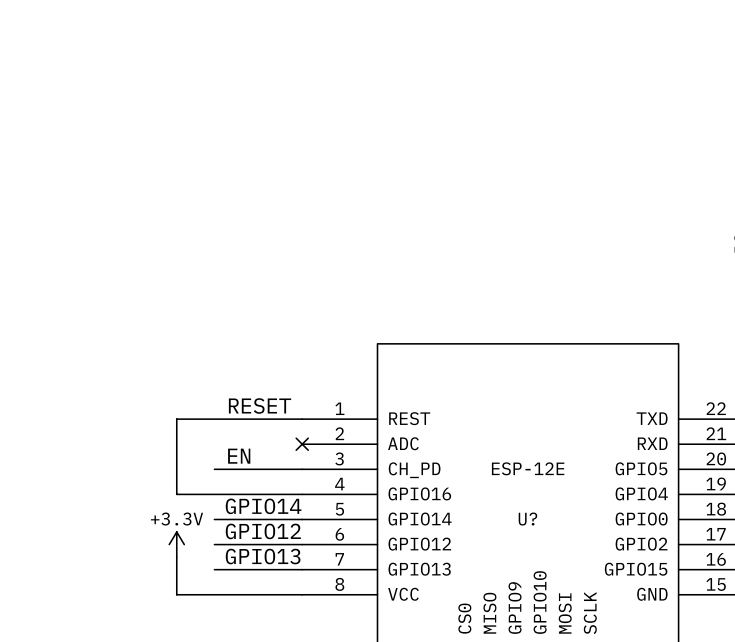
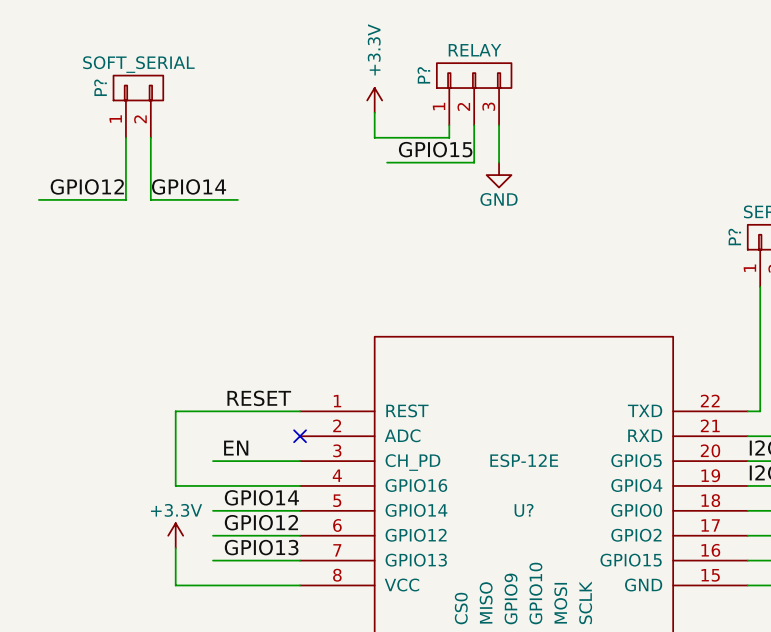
P?: none -> RELAY (474, 94)
power symbol: none -> +3.3V (374, 100)
P?: none -> SOFT_SERIAL (138, 106)
wire: none -> (374, 112) (374, 137) (449, 137) (449, 125)
wire: none -> (474, 125) (474, 162) (387, 162)
wire: none -> (499, 125) (499, 162)
wire: none -> (125, 137) (125, 199) (38, 199)
wire: none -> (150, 137) (150, 199) (237, 199)
label: none -> GPIO15 (435, 149)
power symbol: none -> GND (499, 175)
label: none -> GPIO12 (87, 186)
label: none -> GPIO14 (189, 186)

